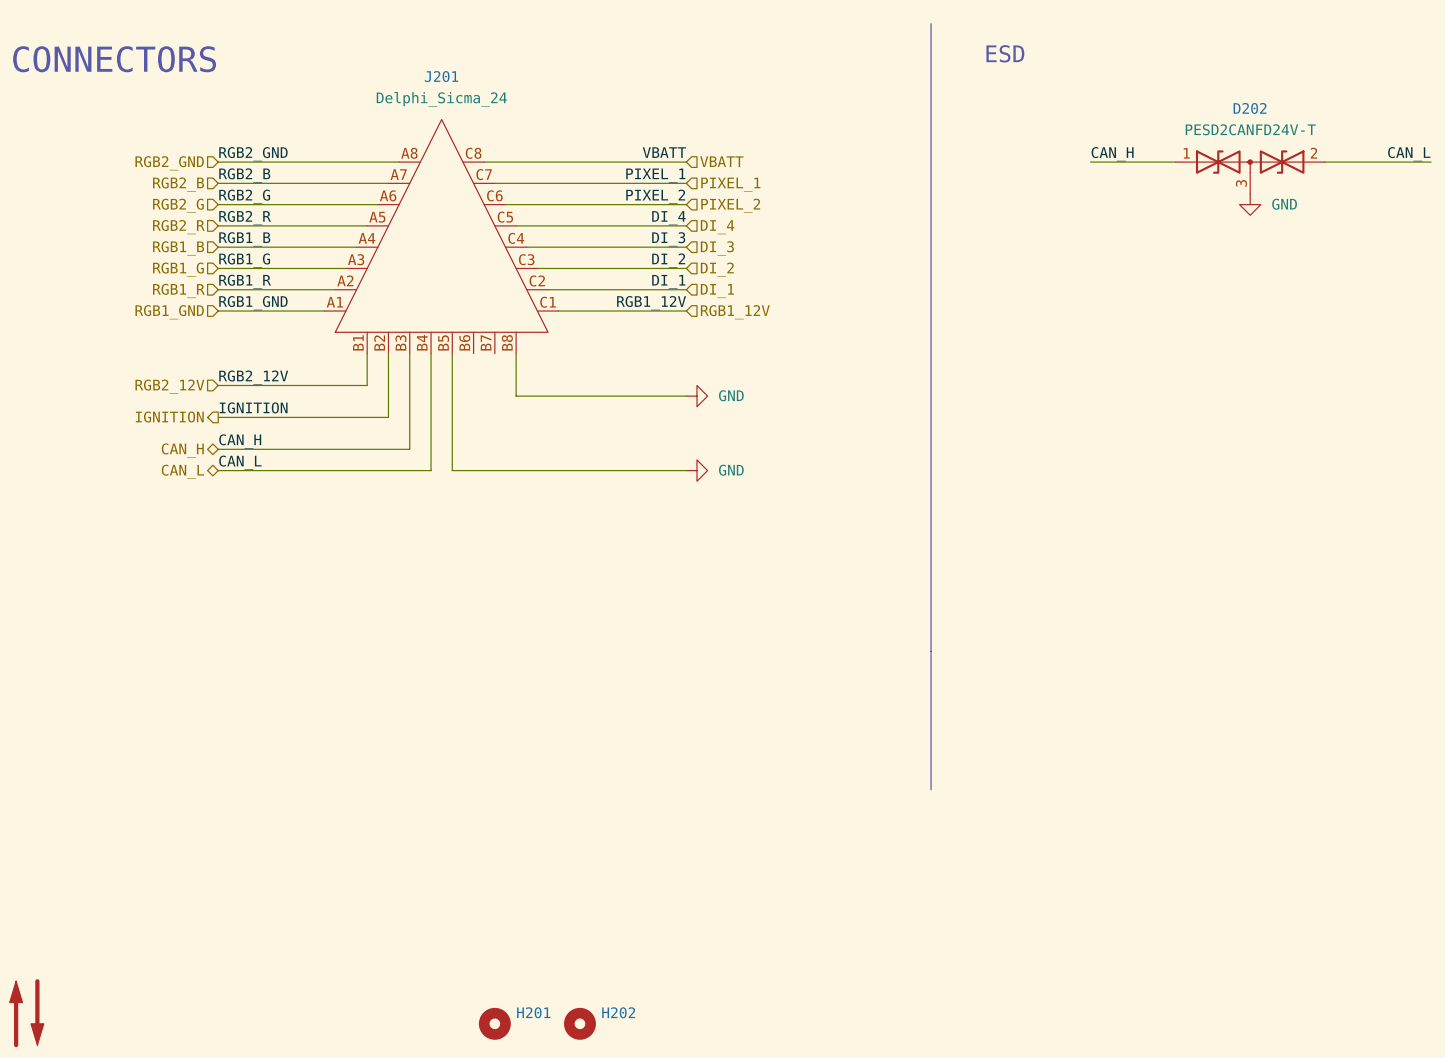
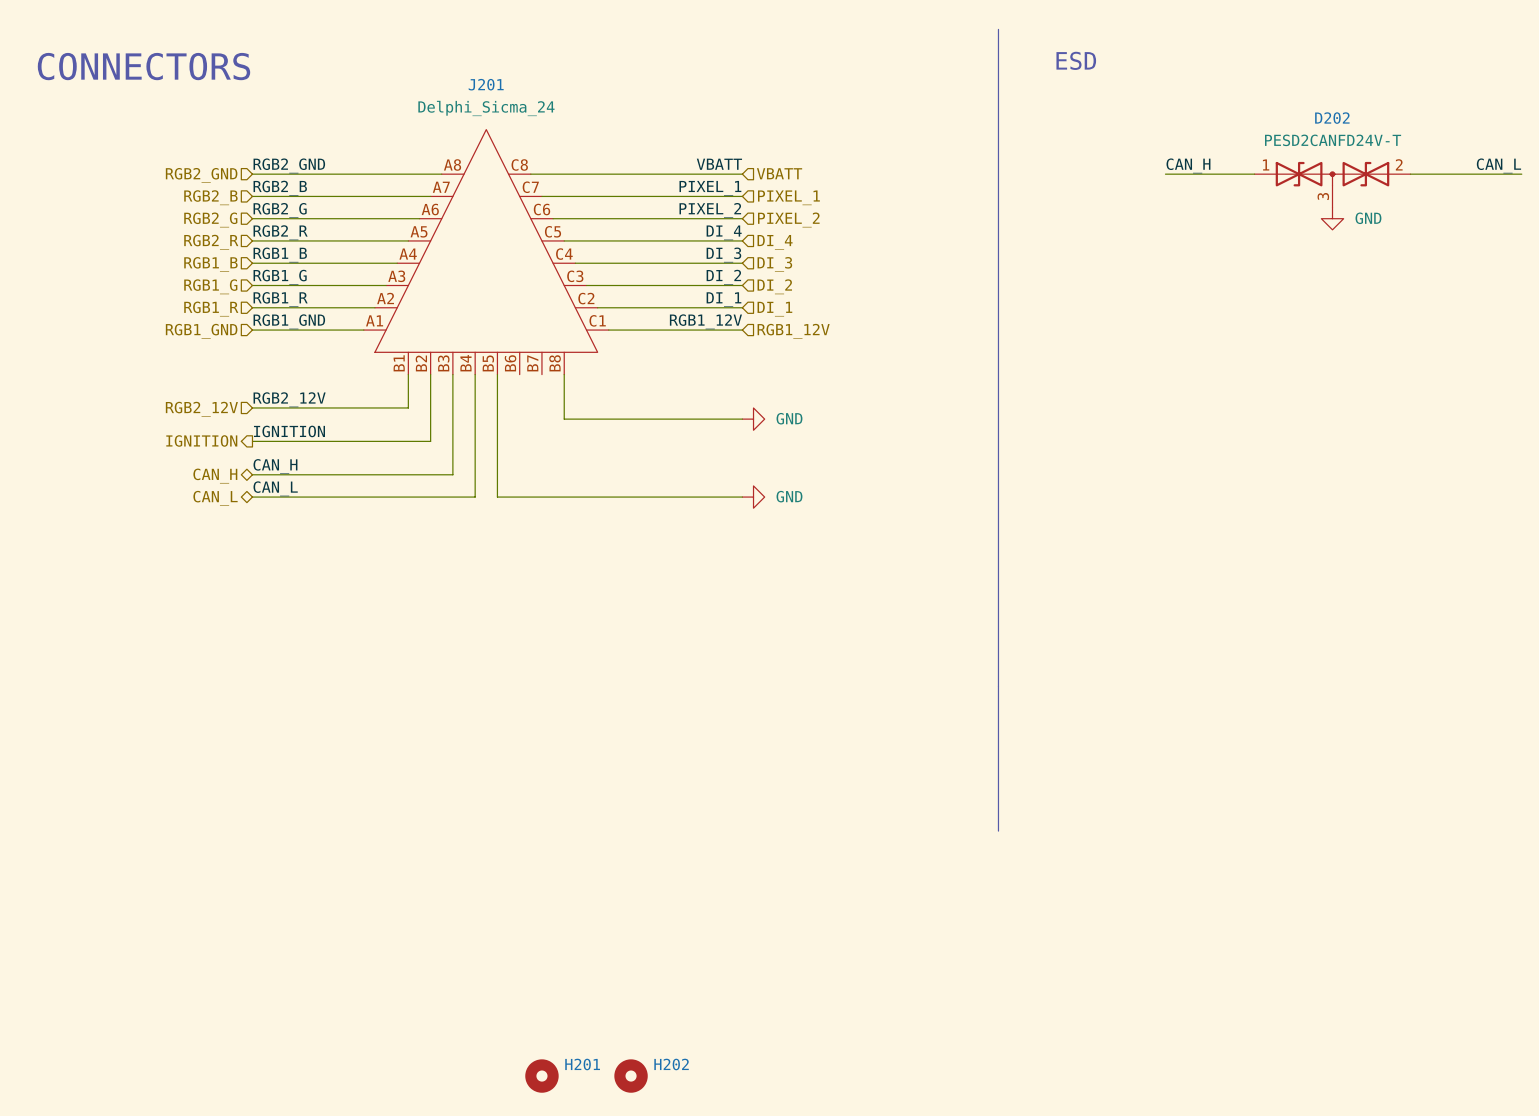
power symbol: (37, 1012) -> none
power symbol: (16, 1014) -> none

